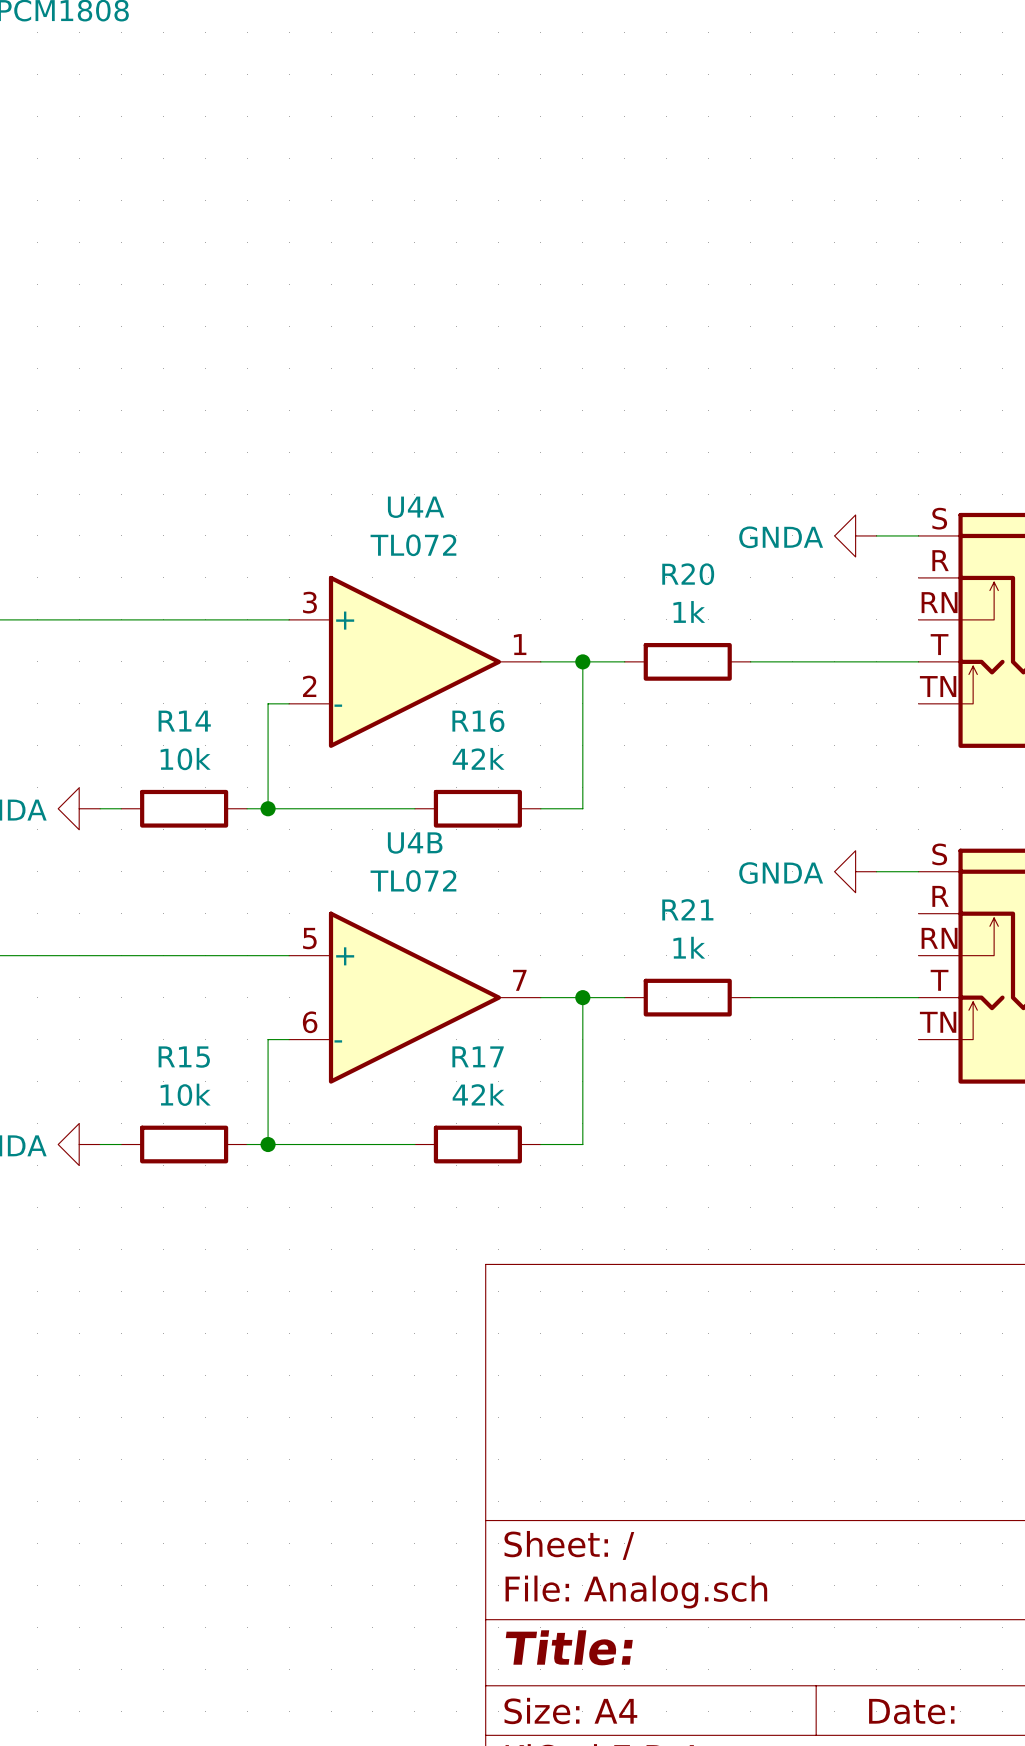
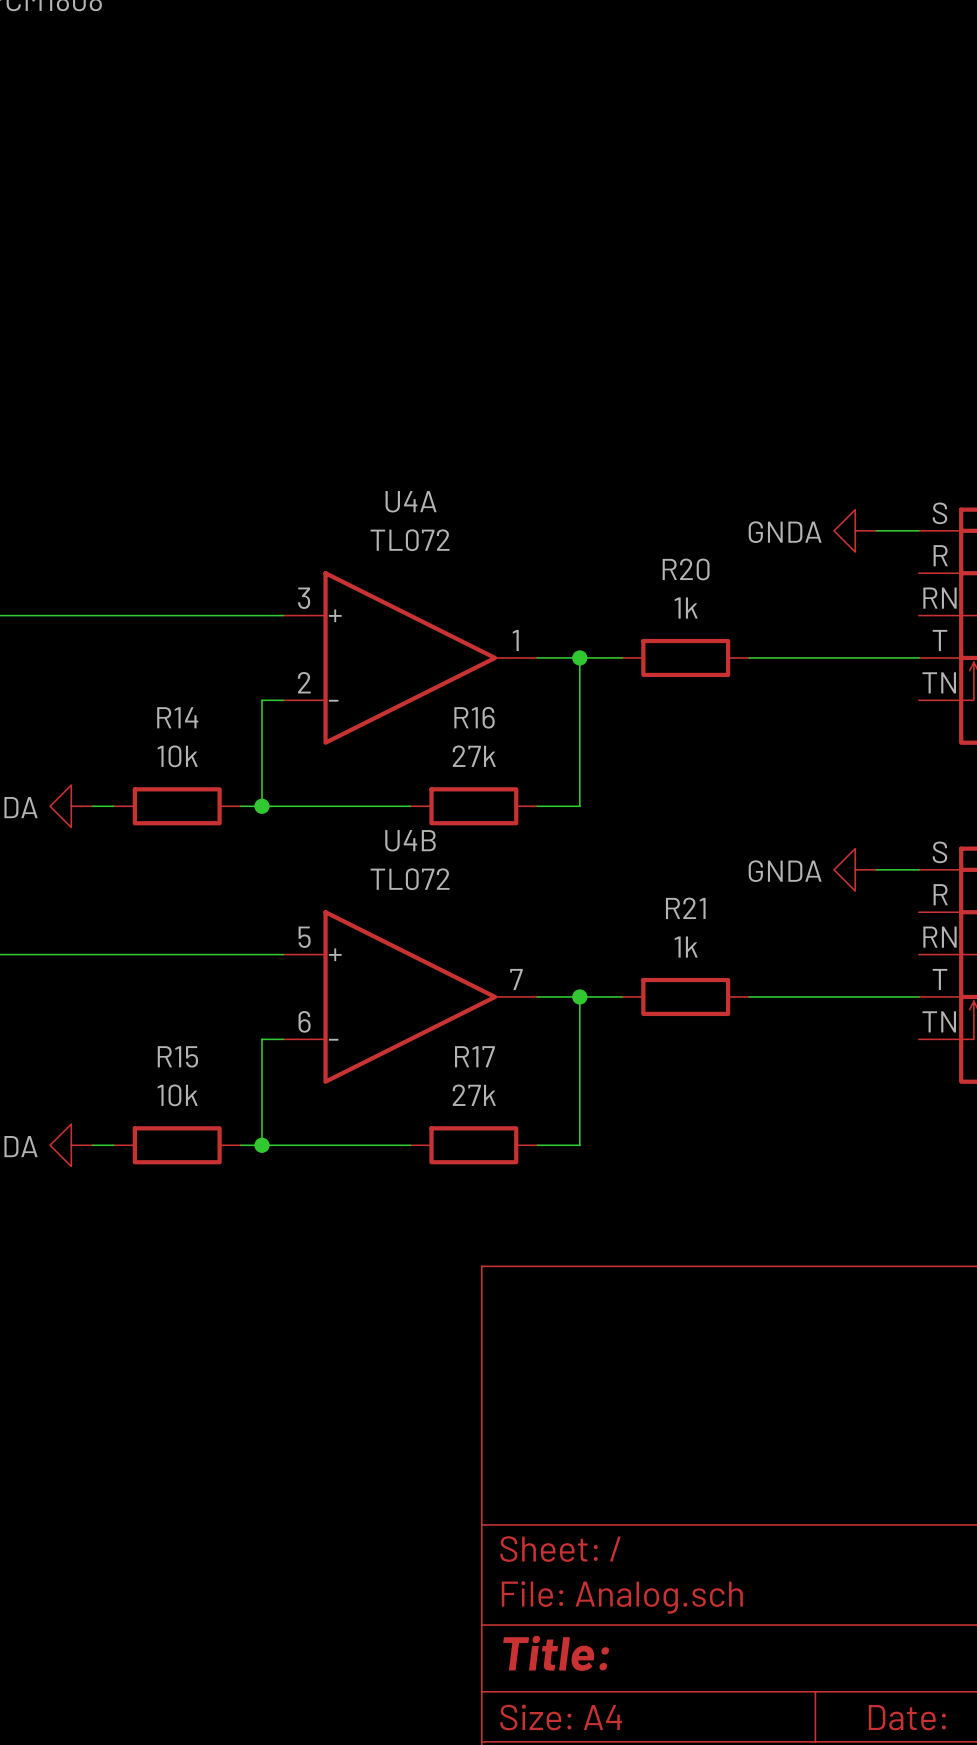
R16 value: 42k (478, 758) -> 27k (474, 756)
R17 value: 42k (478, 1094) -> 27k (474, 1095)

